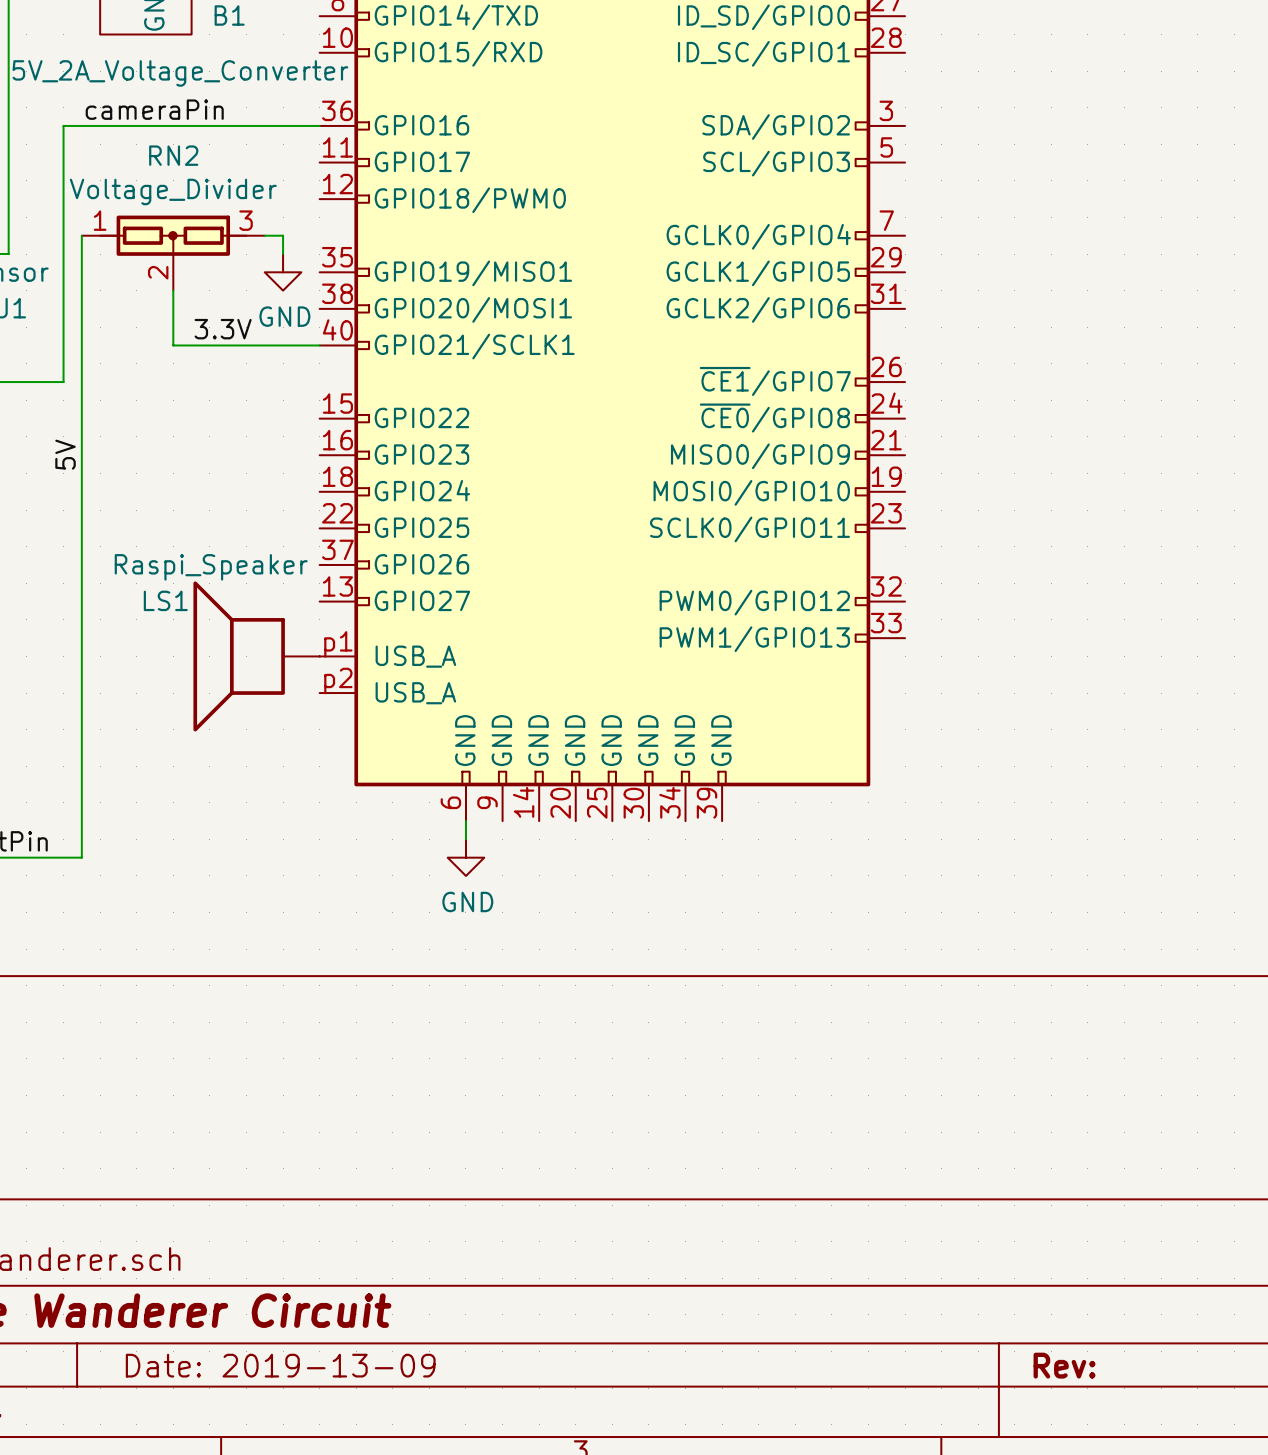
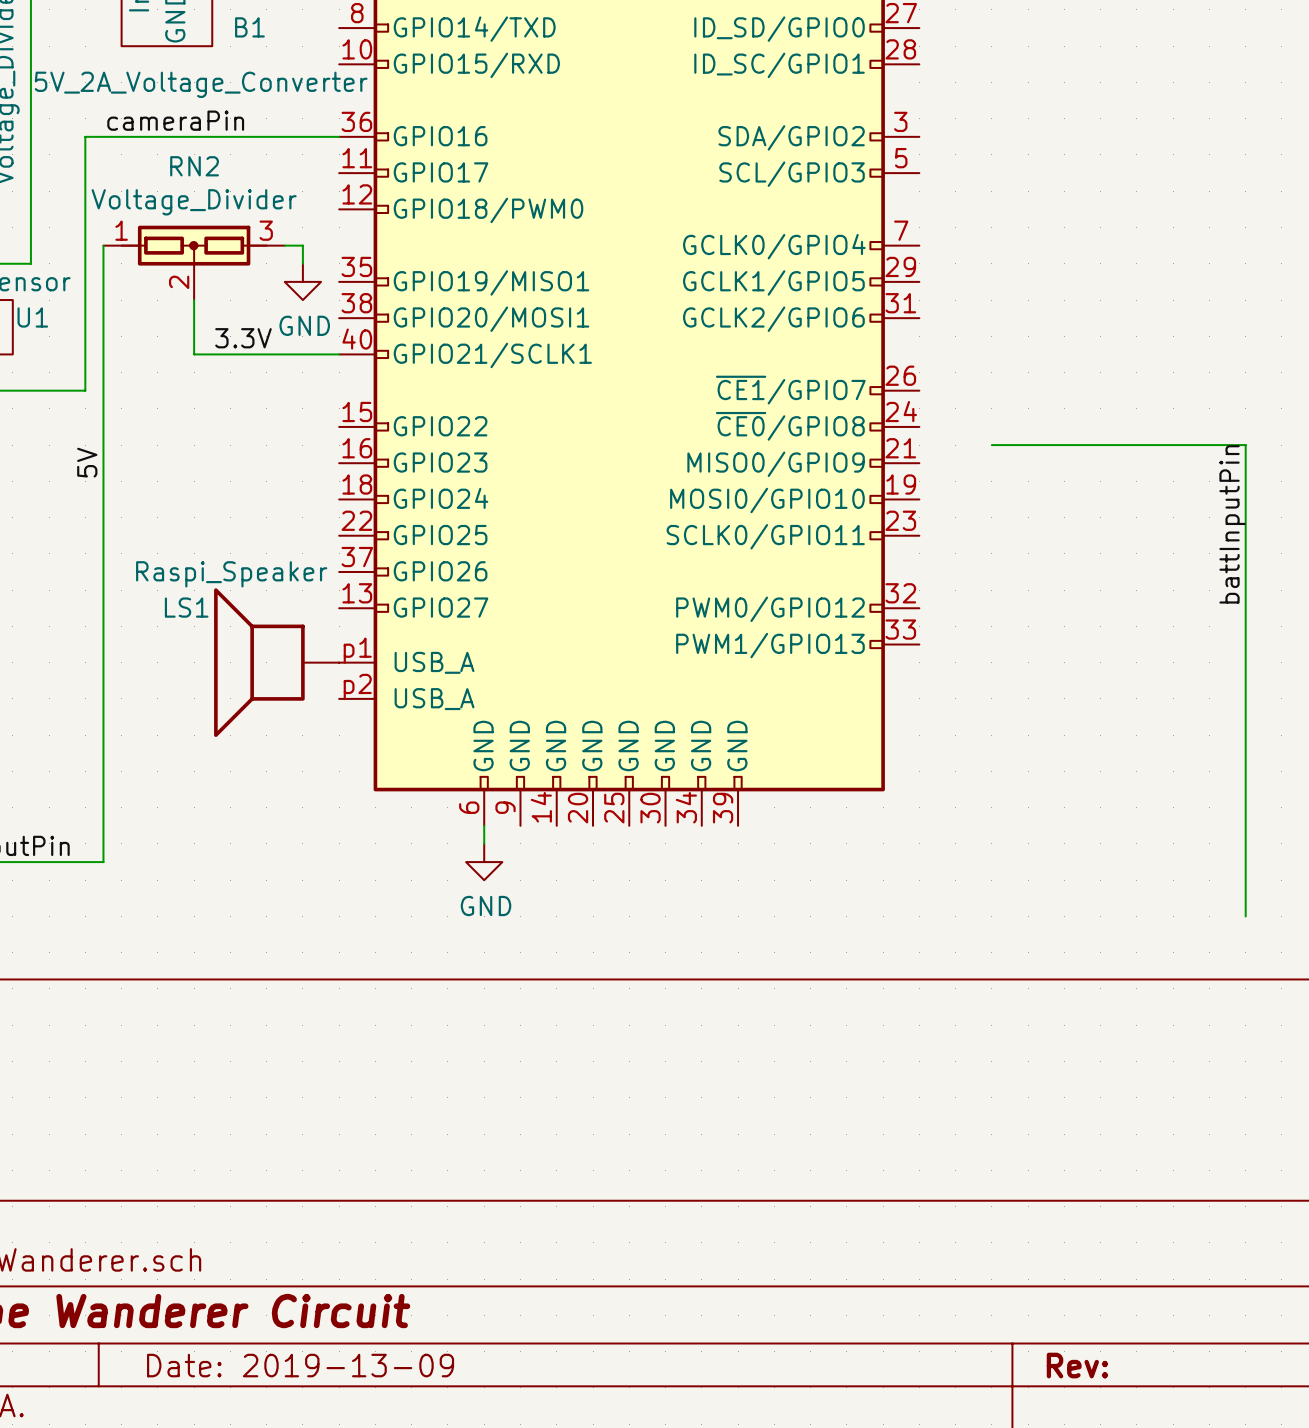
wire: none -> (991, 445) (1245, 445) (1245, 916)
label: none -> battInputPin (1232, 524)

